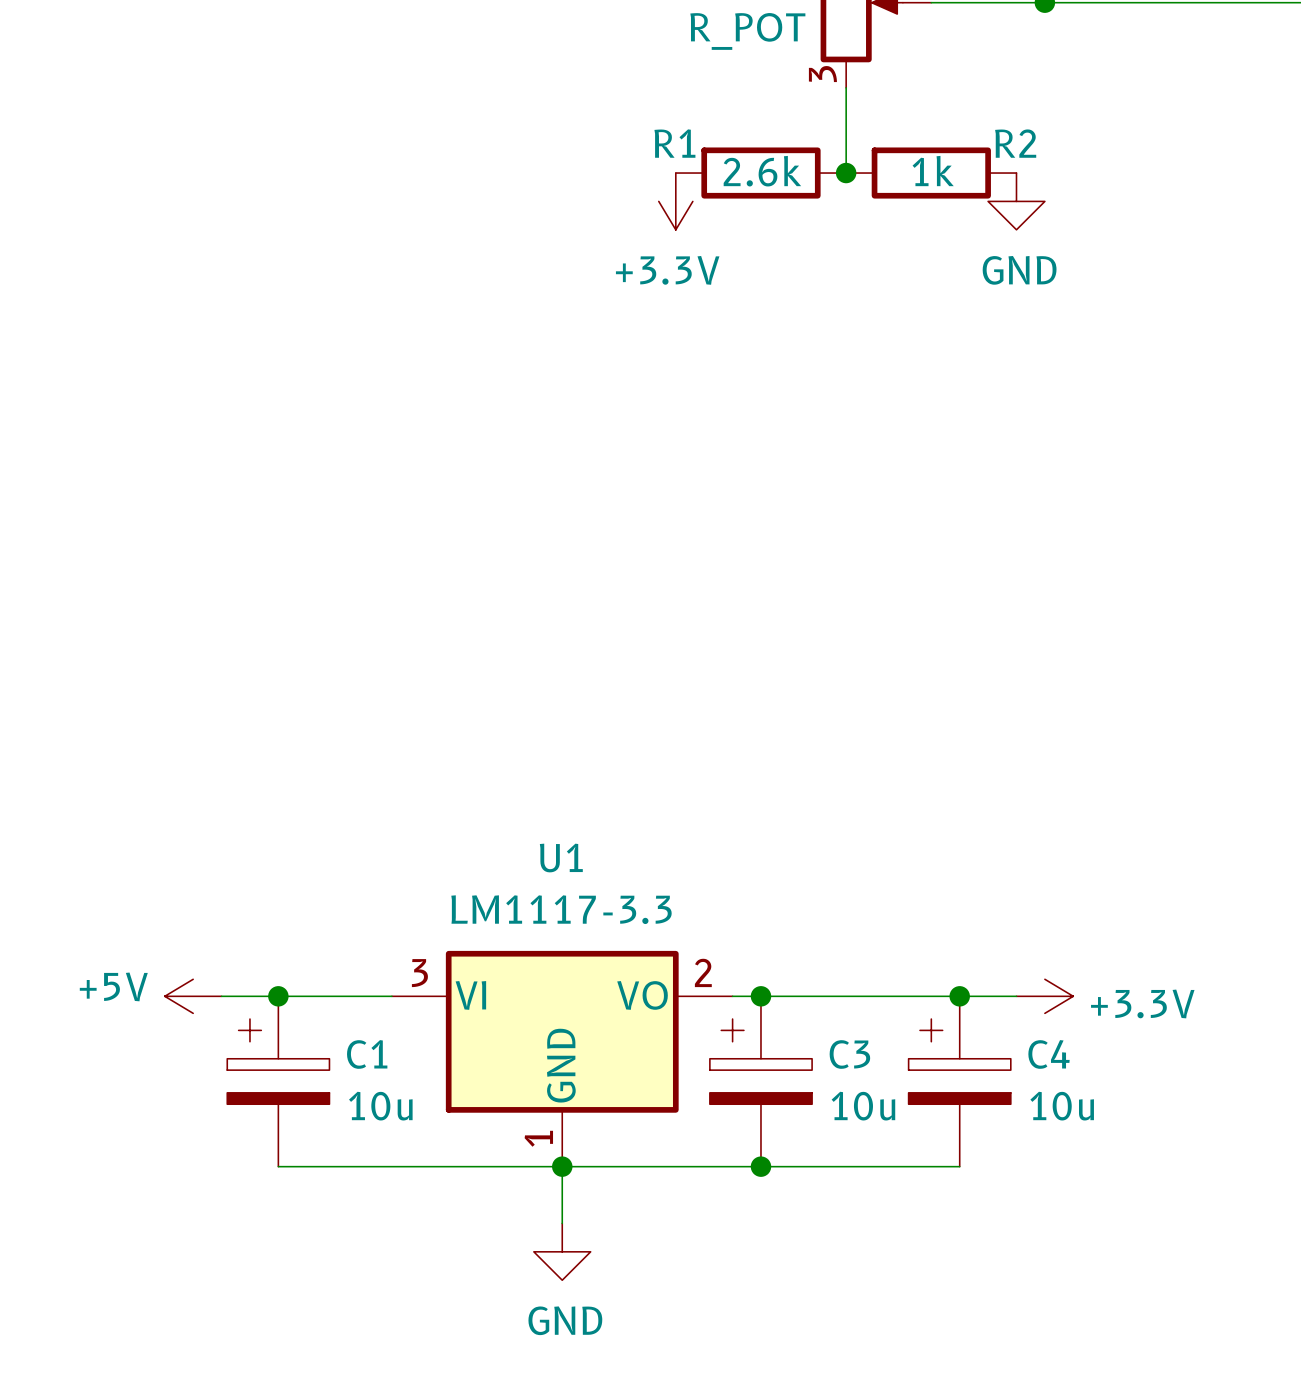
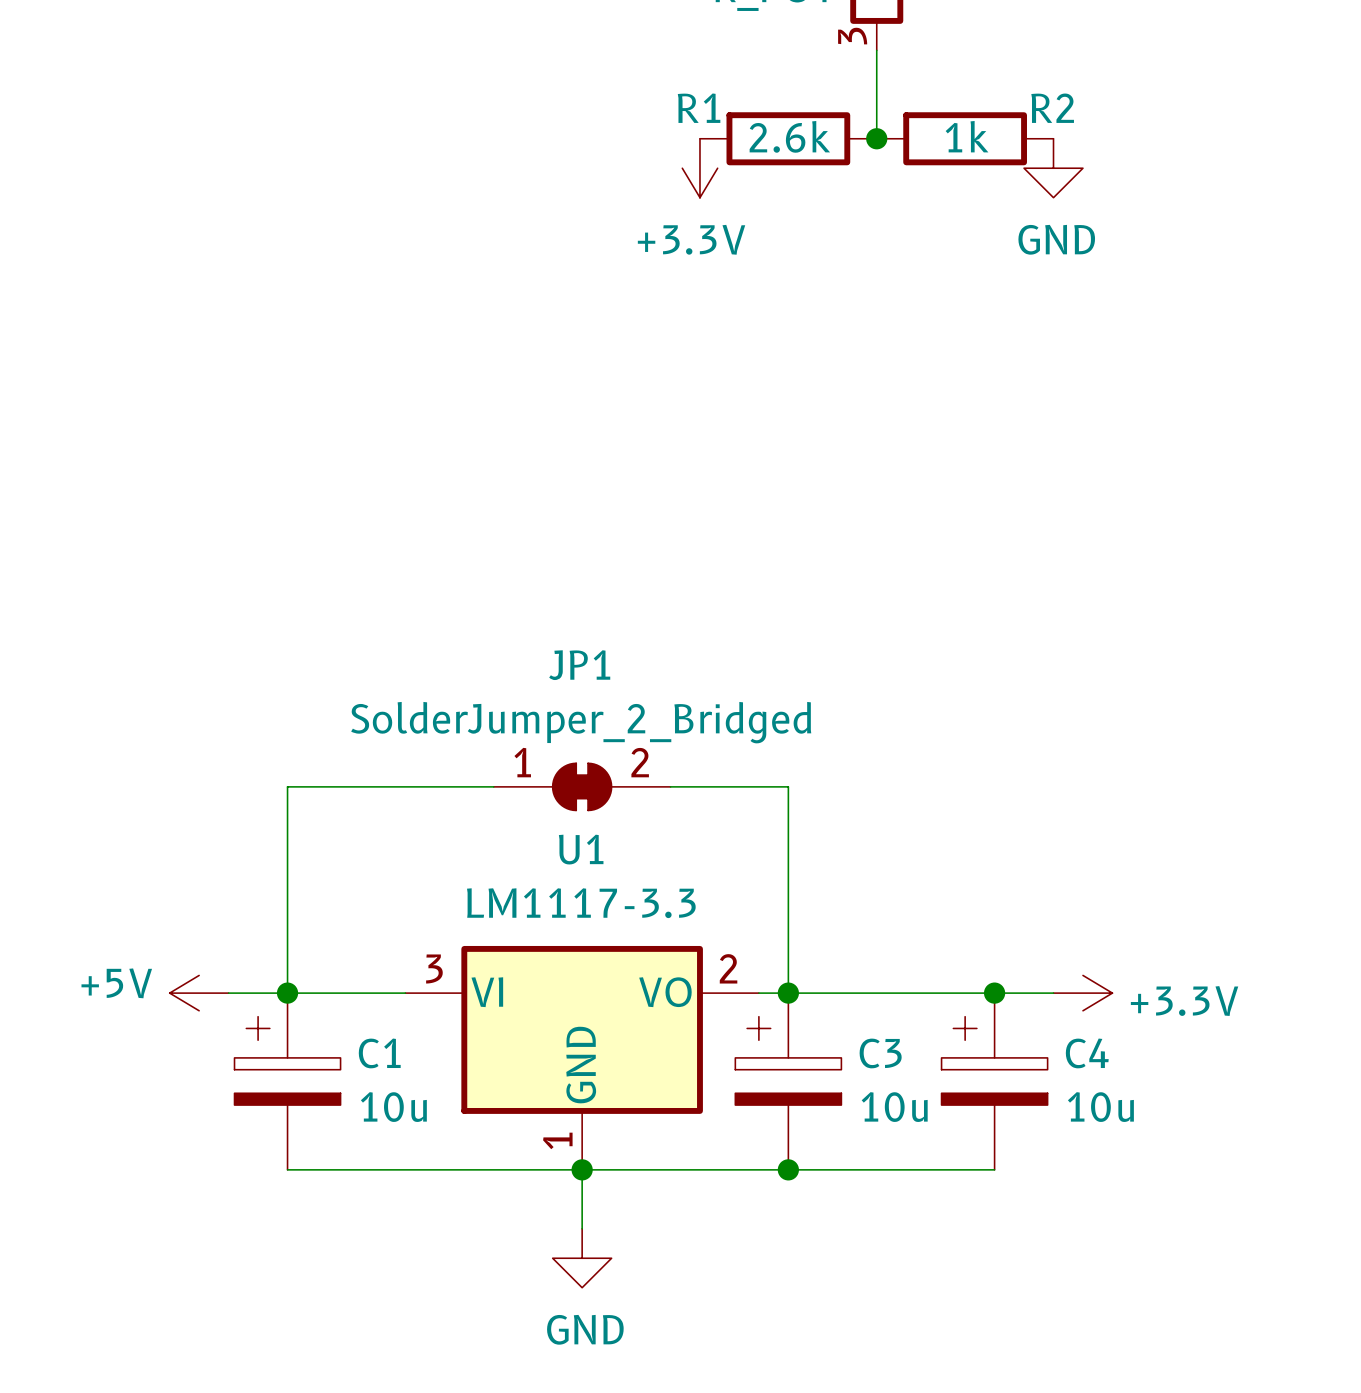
wire: none -> (493, 786) (287, 786) (287, 993)
JP1: none -> SolderJumper_2_Bridged (582, 786)
wire: none -> (670, 786) (788, 786) (788, 993)

